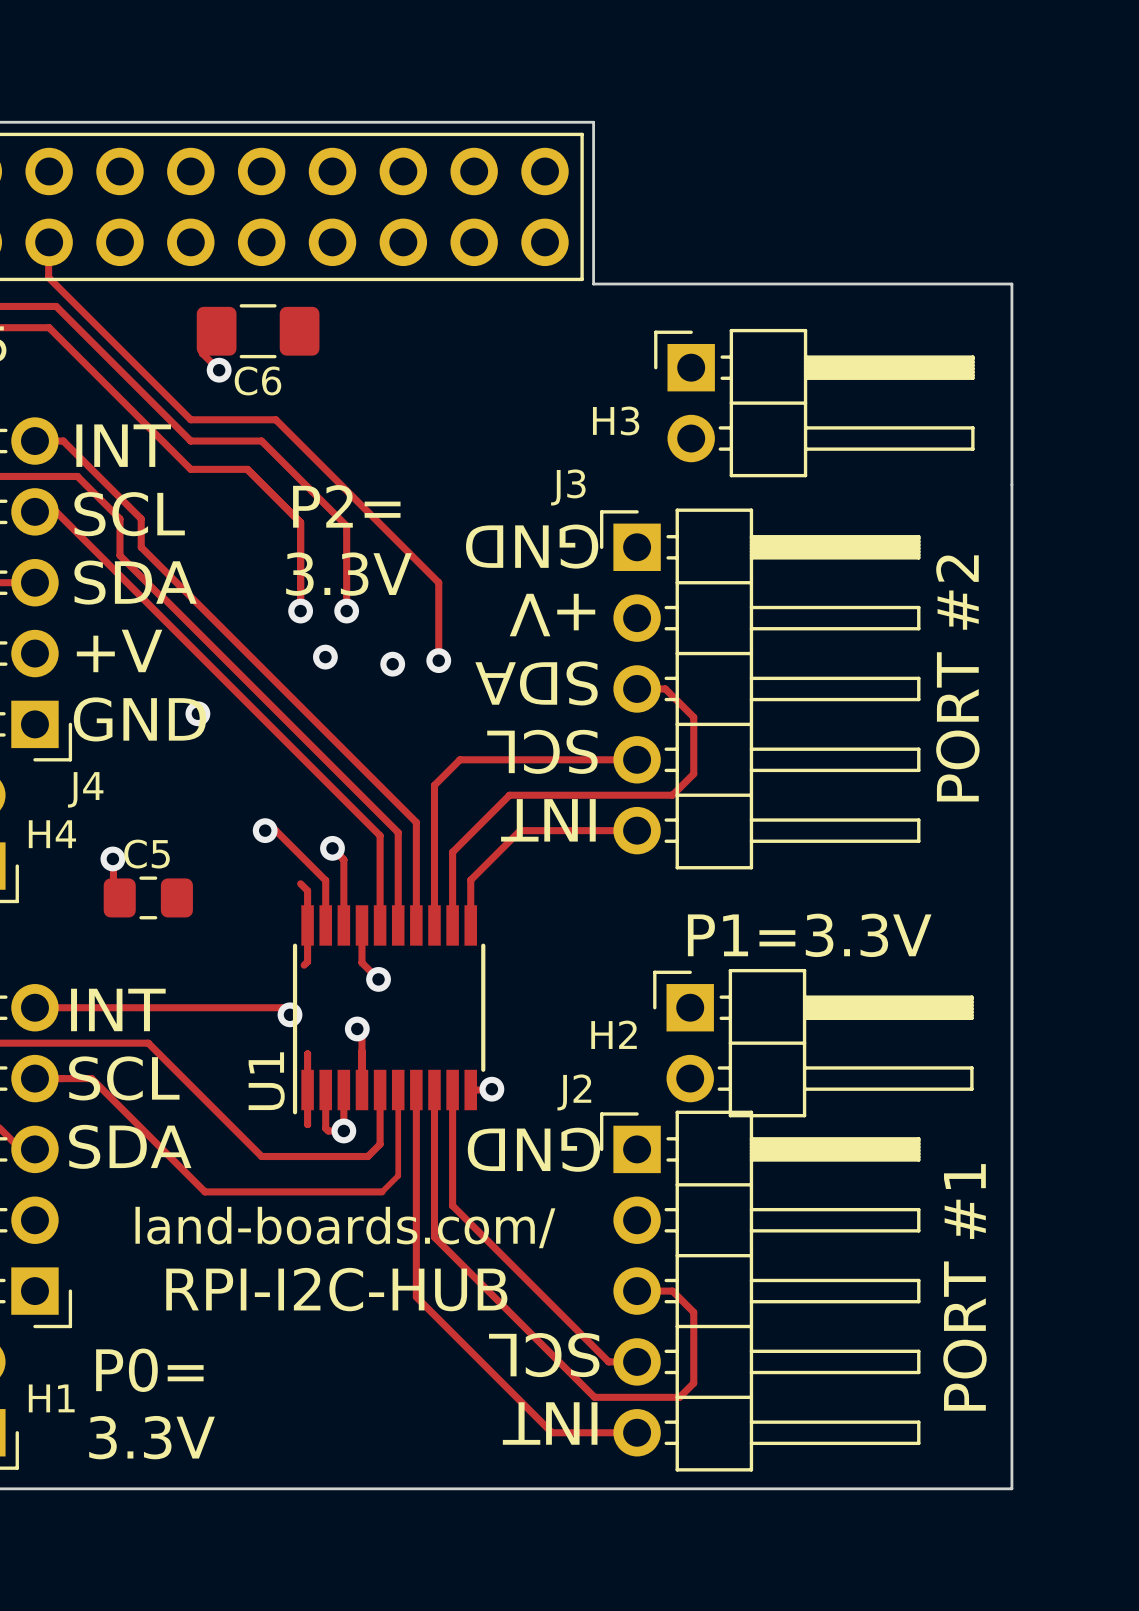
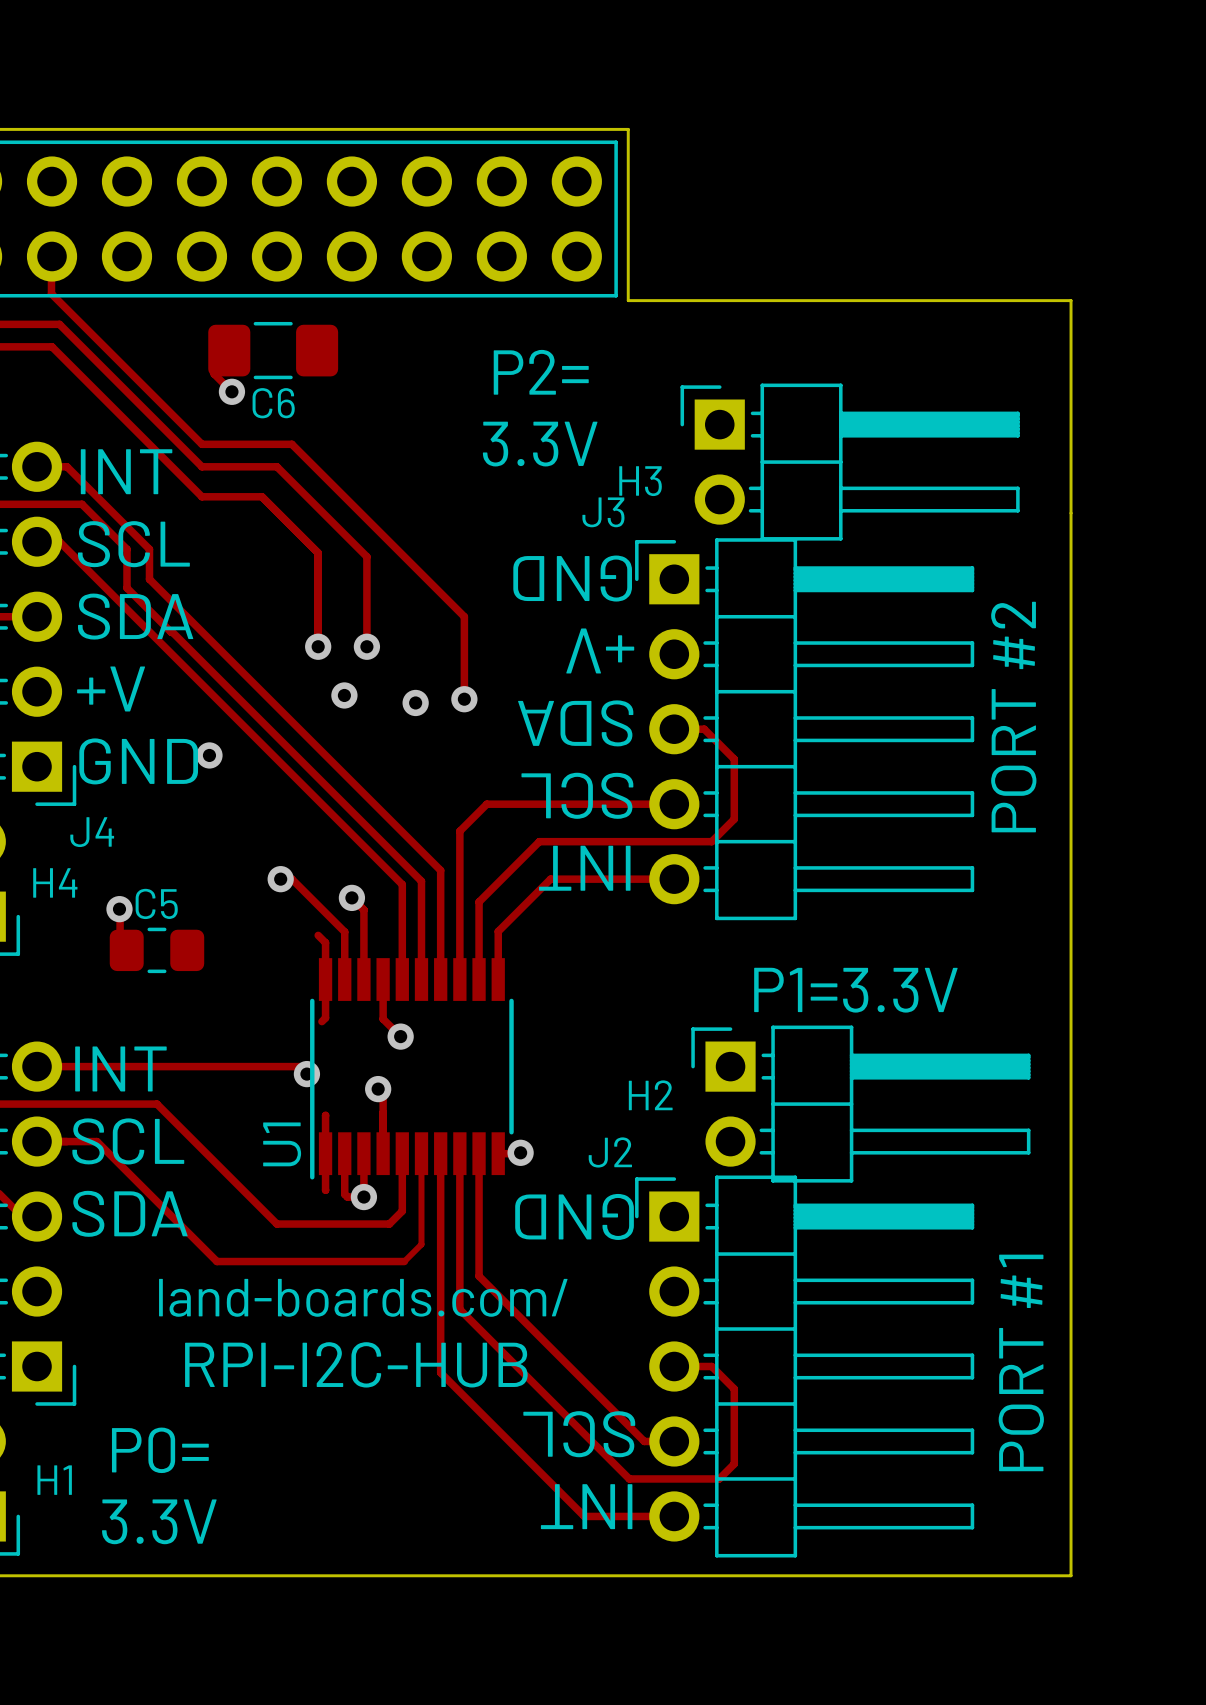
H3 position: (814, 403) -> (850, 462)
text position: P2= (346, 506) -> P2= (541, 372)
text position: 3.3V (348, 574) -> 3.3V (540, 444)

